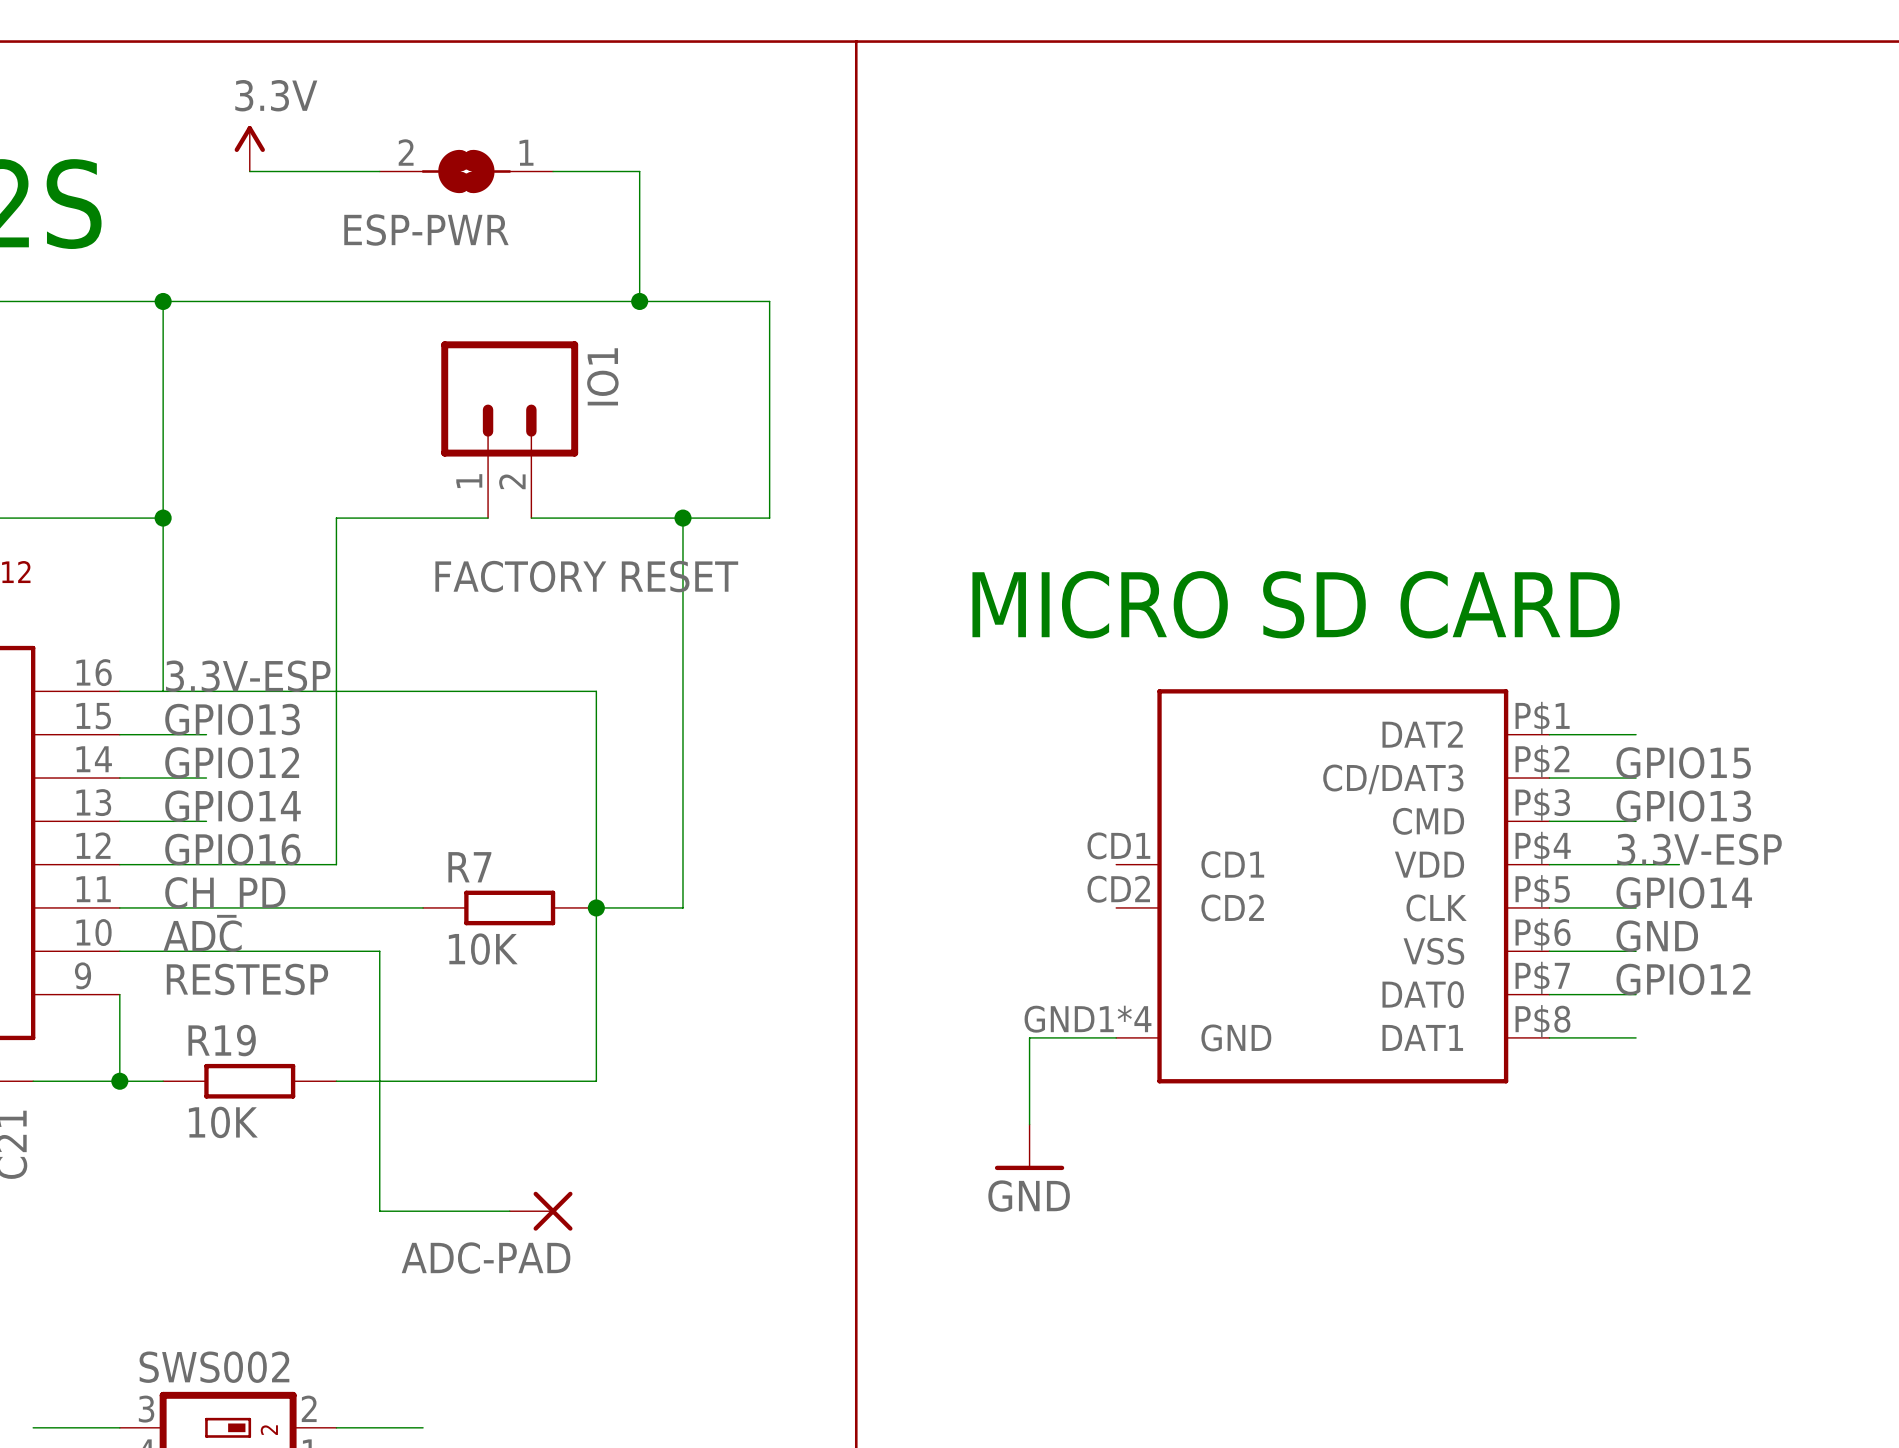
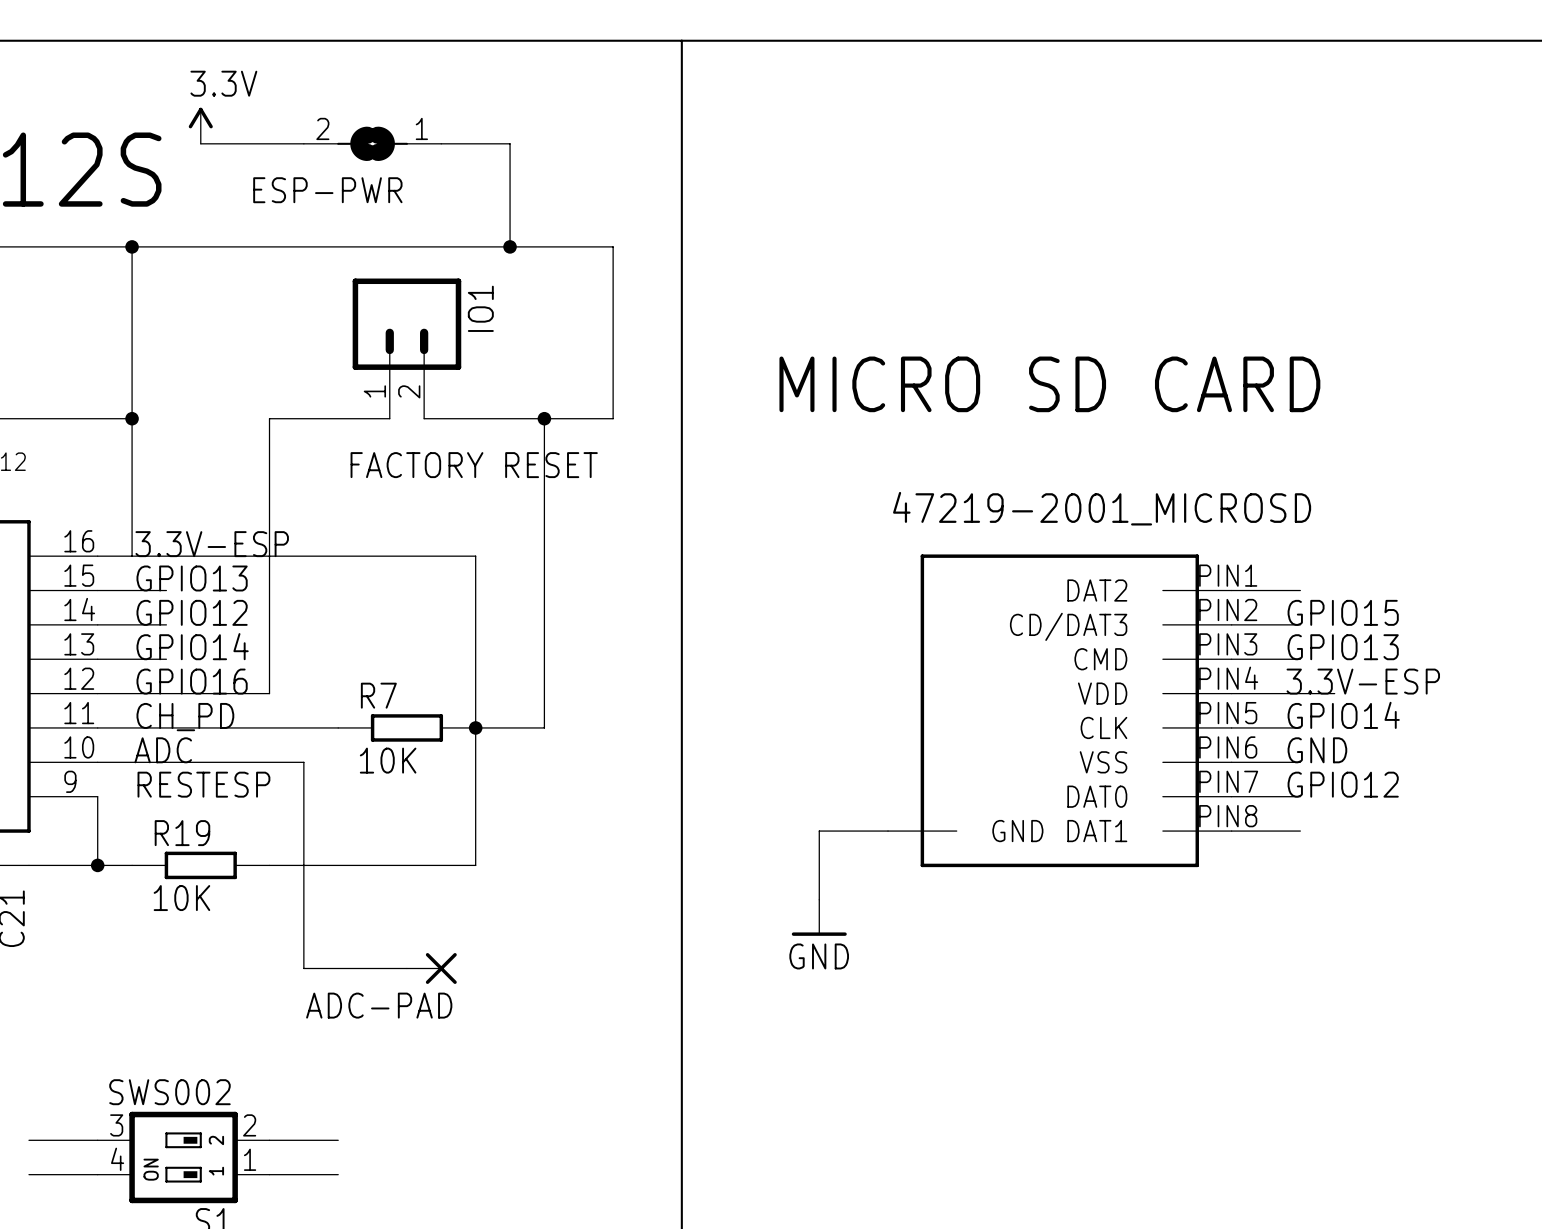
text position: MICRO SD CARD (1296, 604) -> MICRO SD CARD (1049, 384)
part symbol: [1116, 689, 1550, 1084] -> [888, 554, 1232, 868]

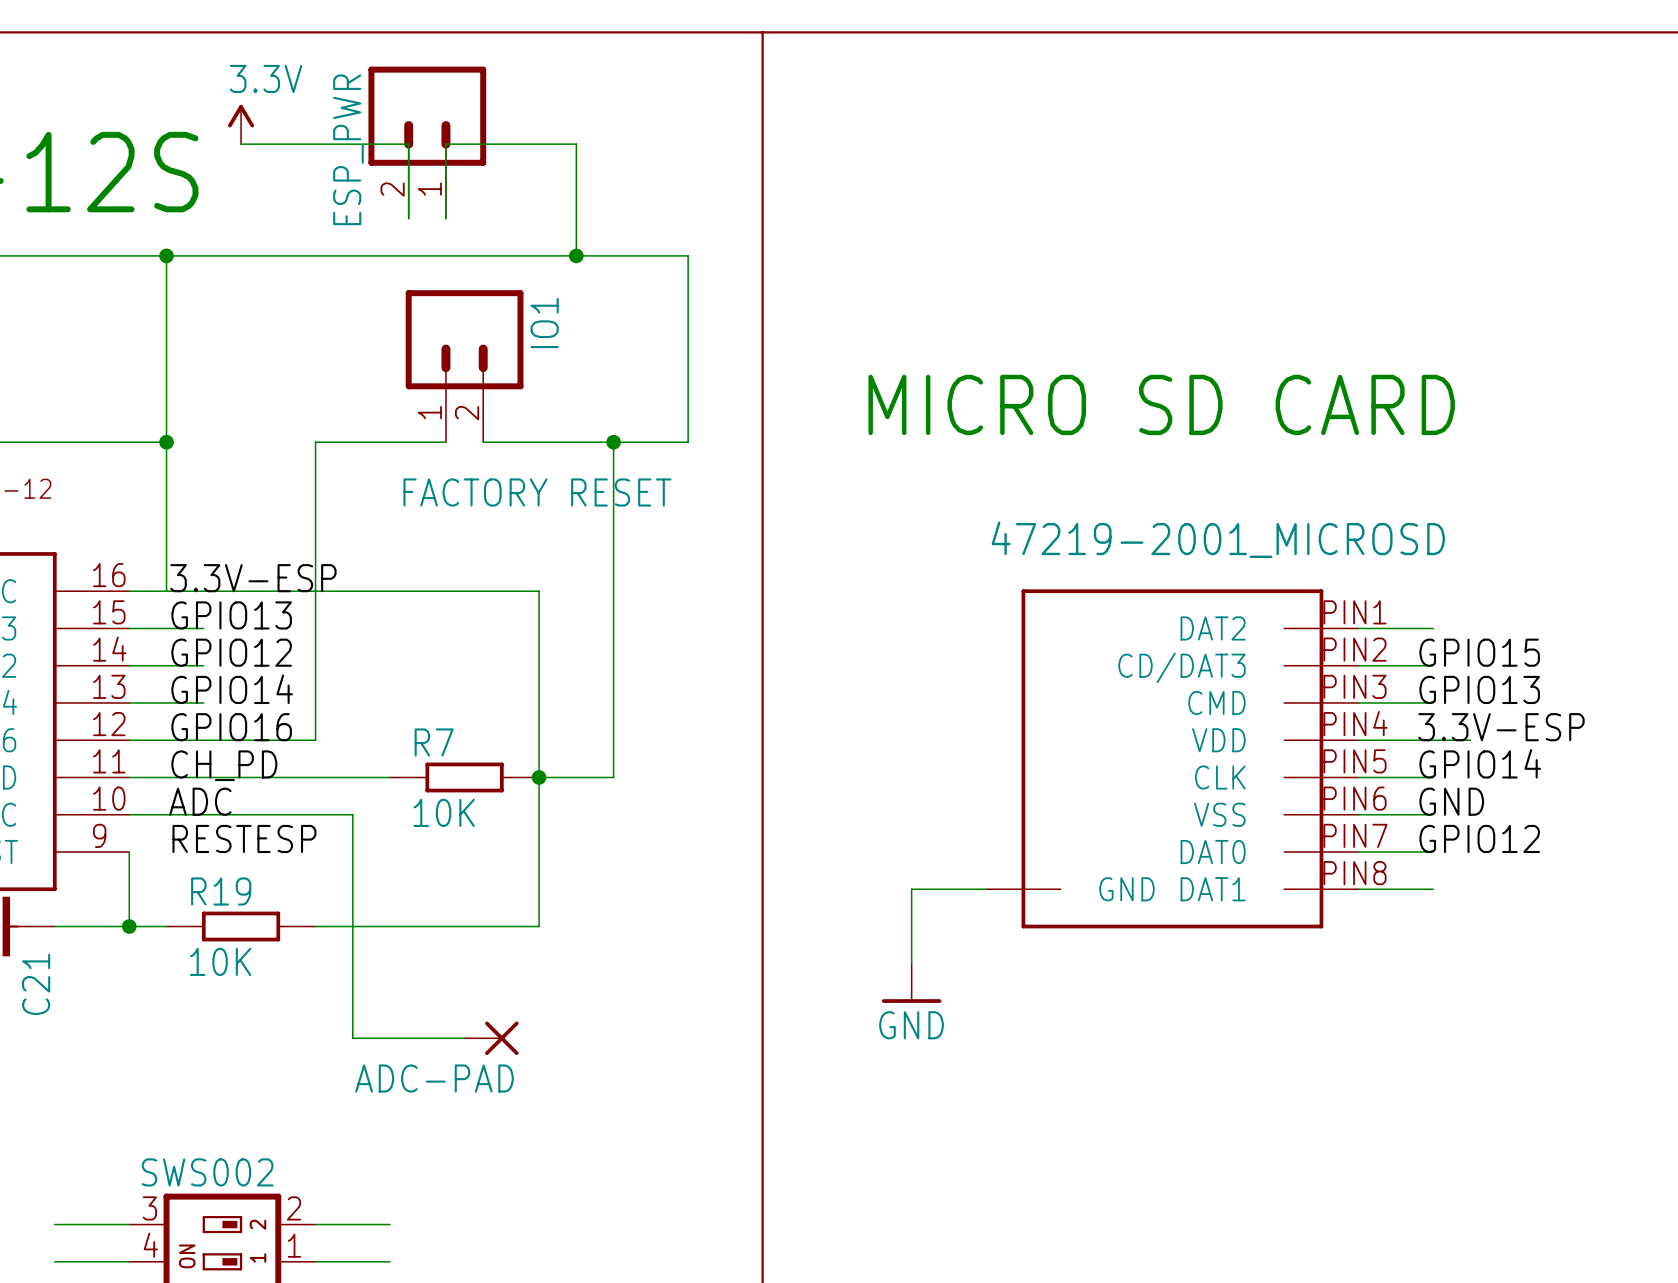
ESP_PWR: none -> (427, 142)
ESP-PWR: (372, 143) -> none

